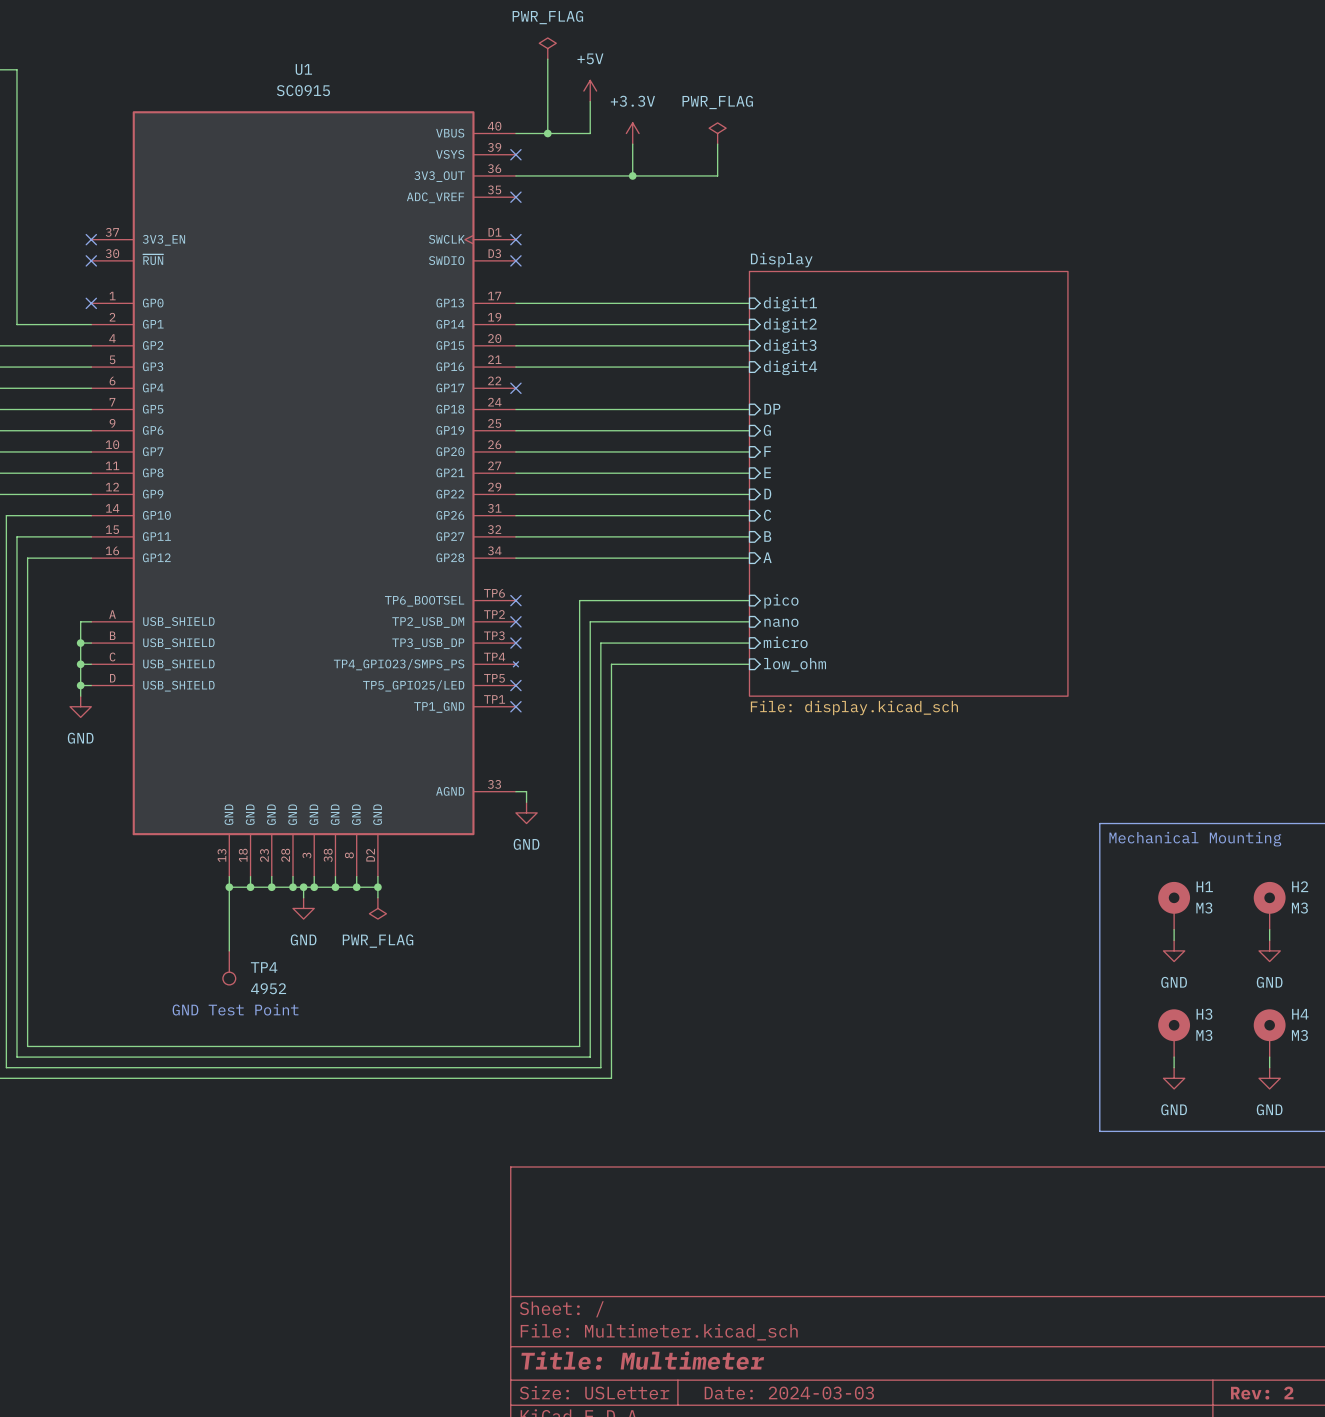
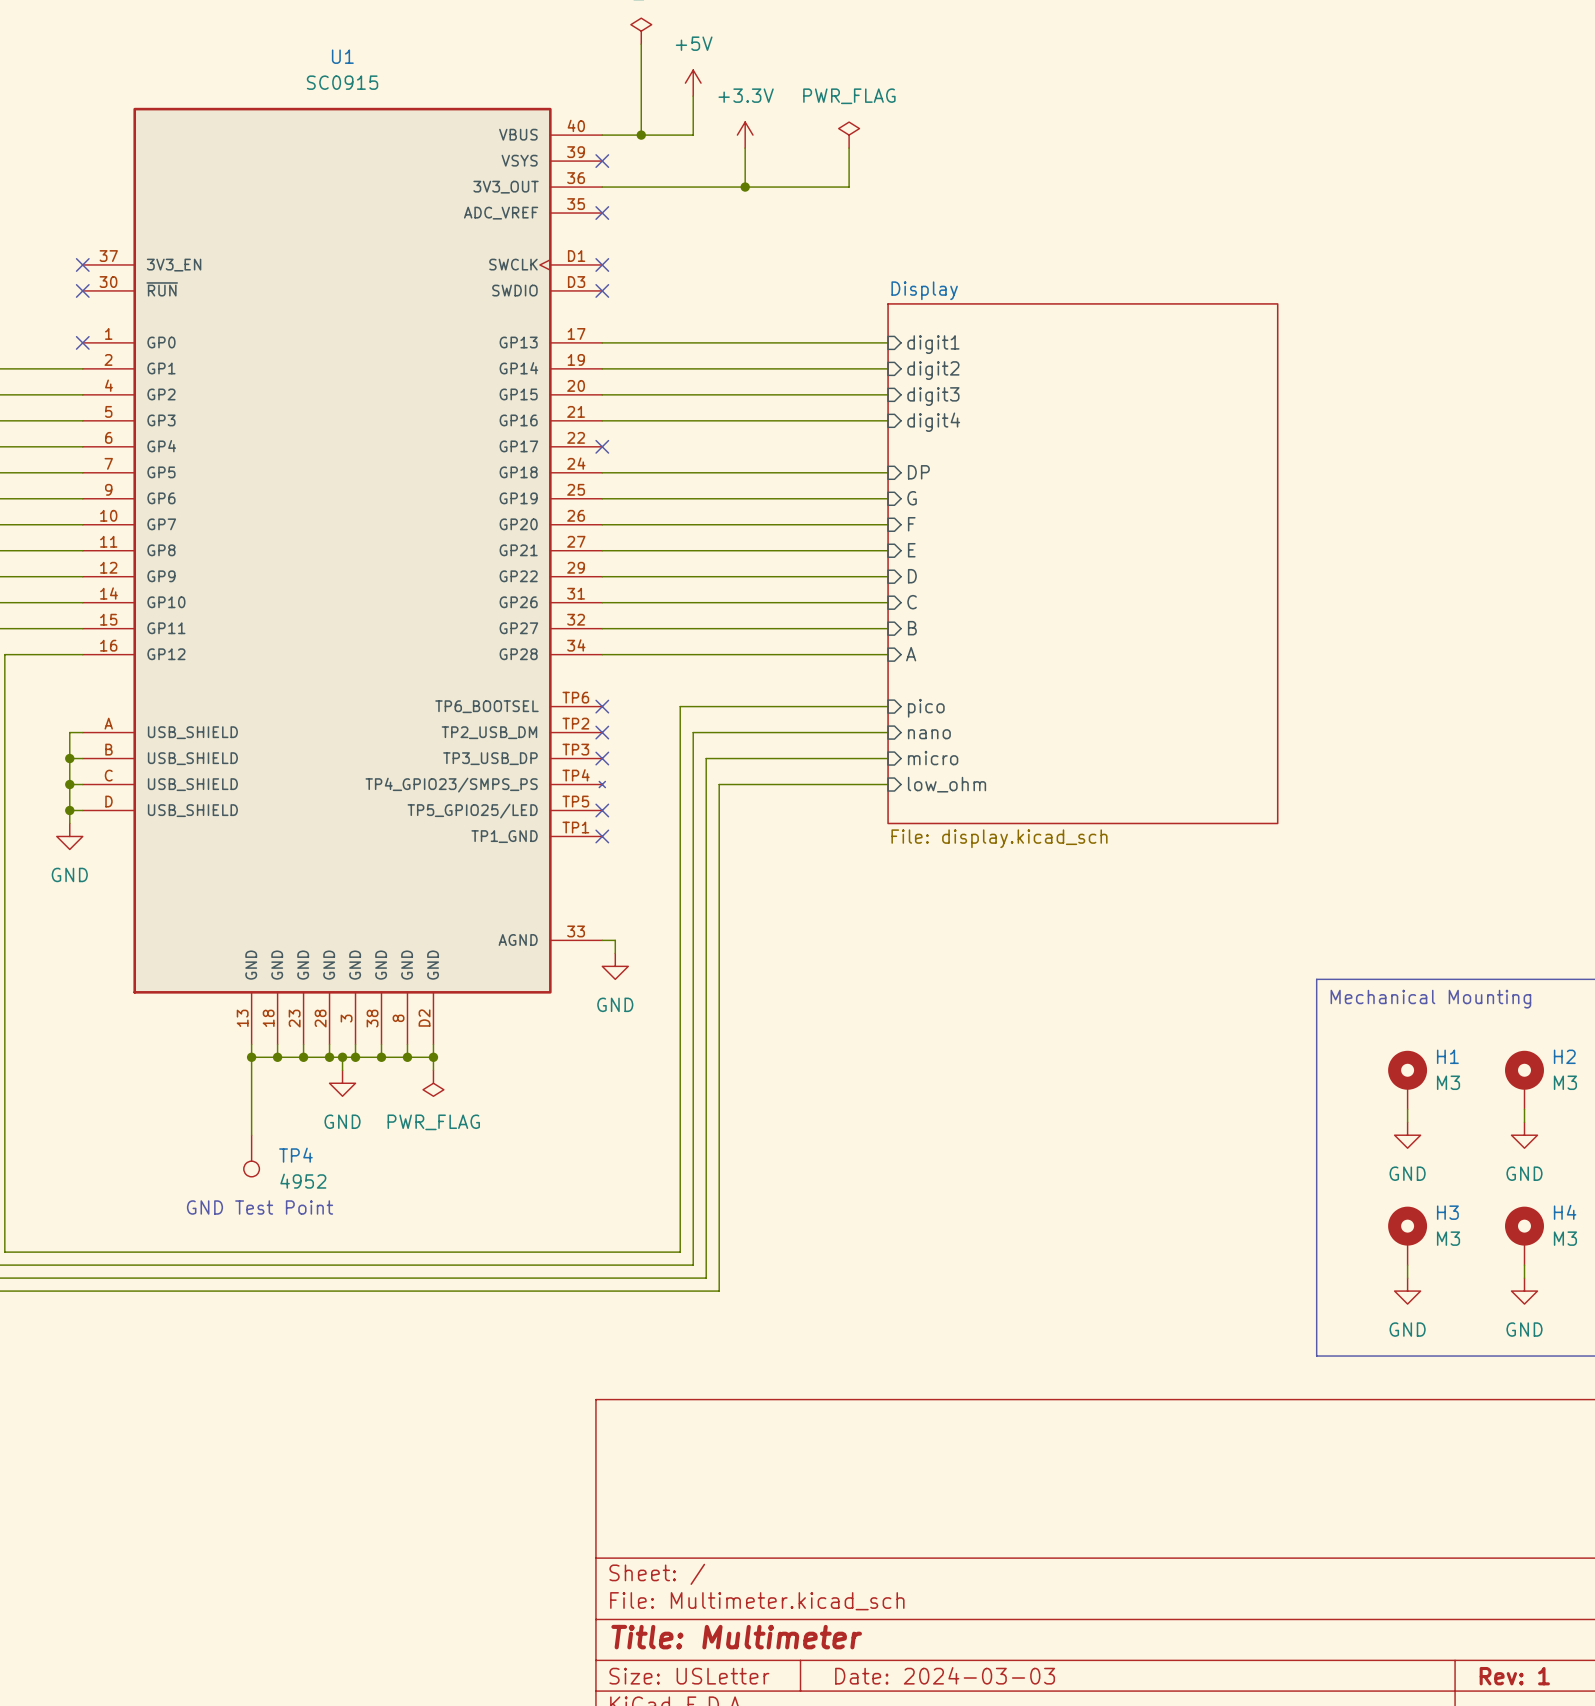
title block: Rev: 2 (1262, 1393) -> Rev: 1 (1514, 1676)

